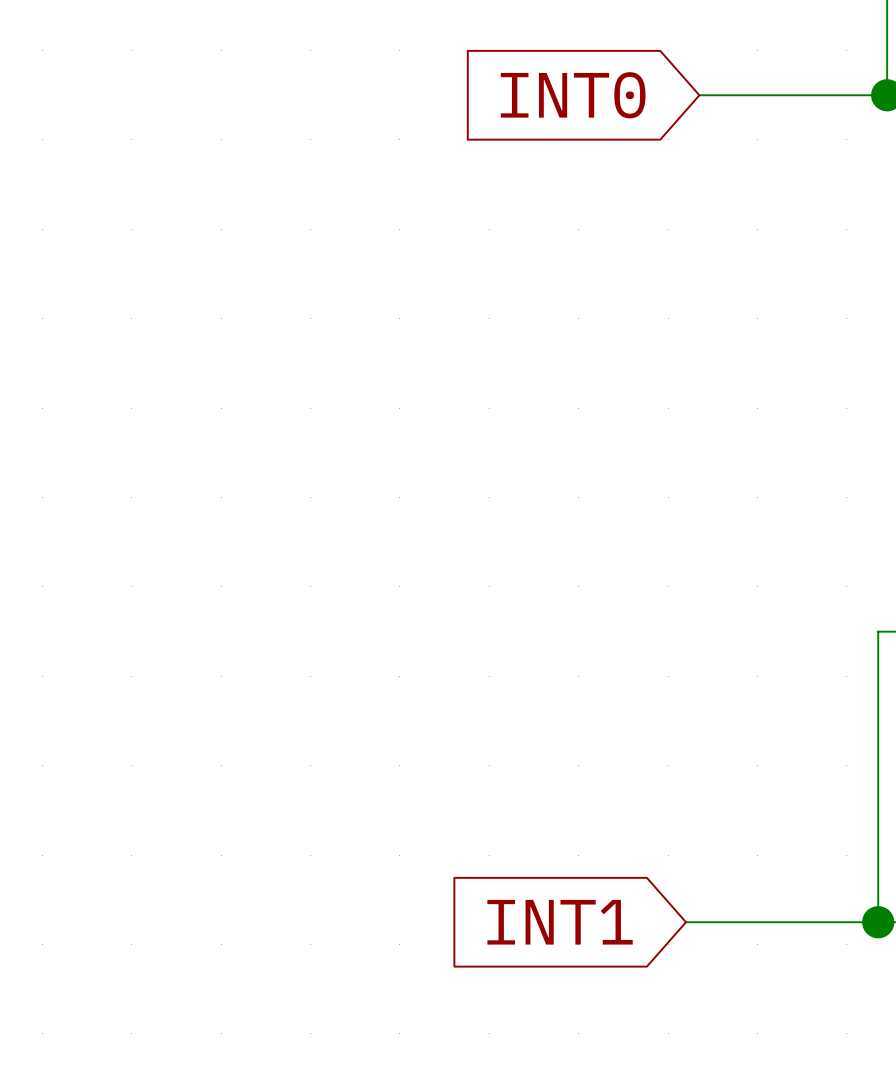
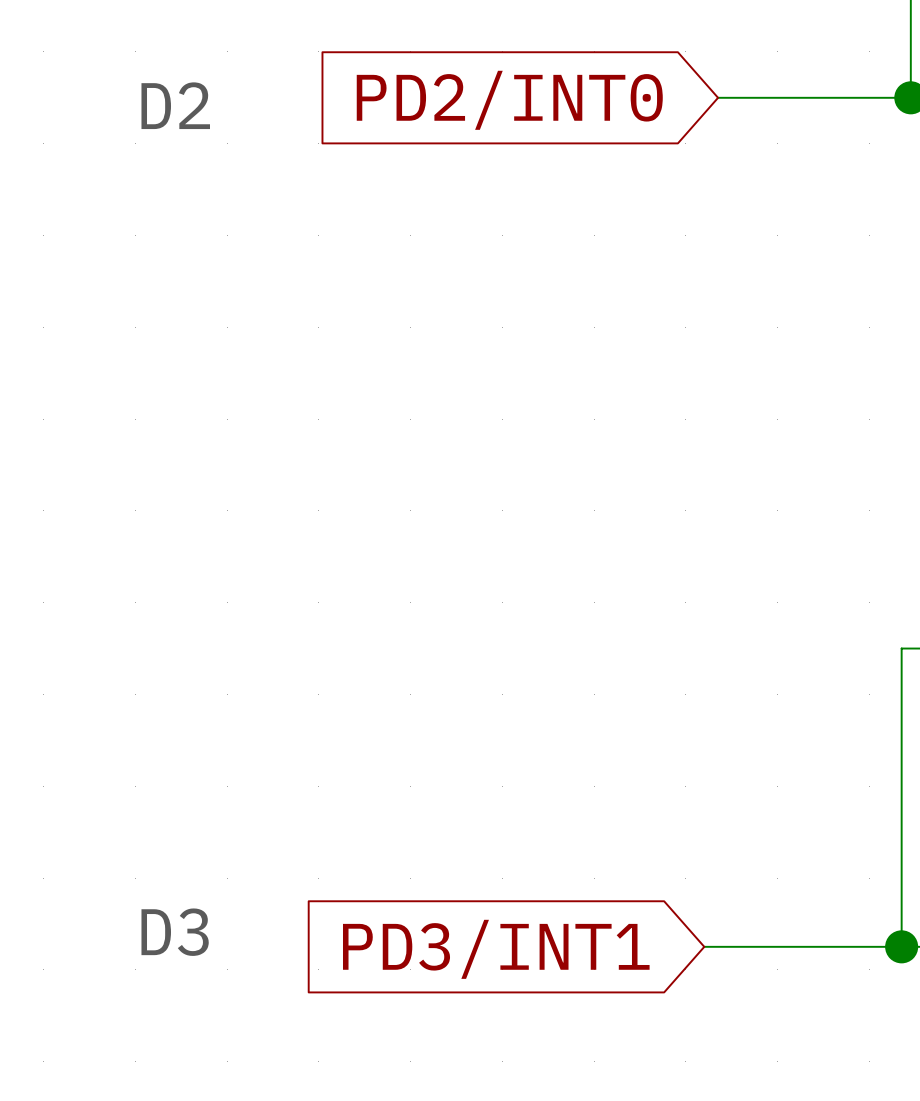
global label: INT0 (573, 95) -> PD2/INT0 (509, 100)
text: none -> D2 (175, 105)
text: none -> D3 (175, 932)
global label: INT1 (560, 922) -> PD3/INT1 (496, 949)

